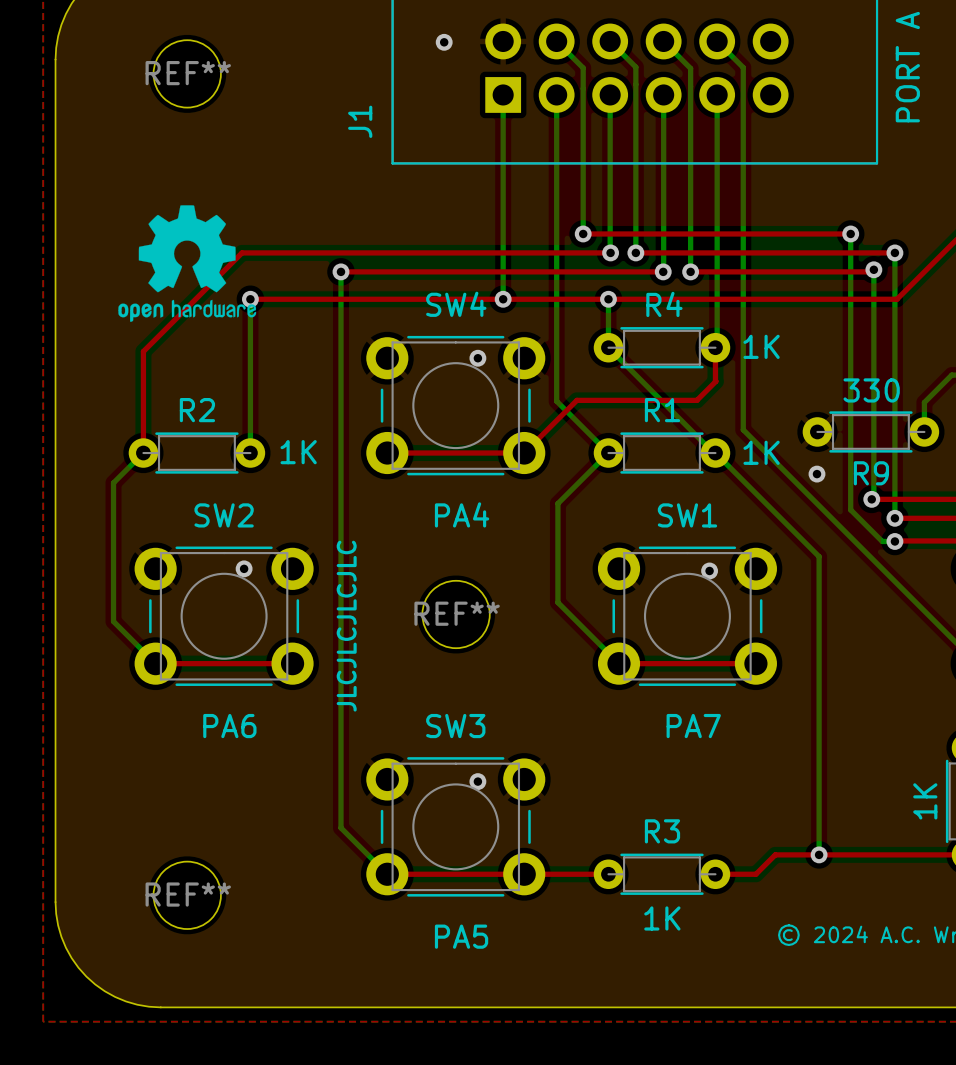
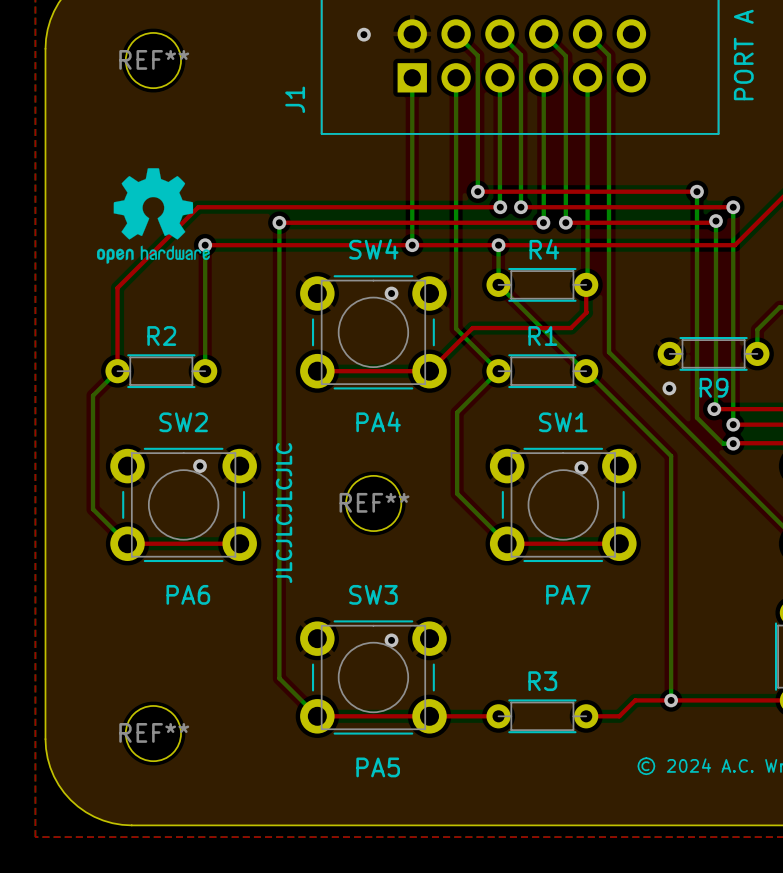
R4 value: 1K (761, 346) -> none
R9 value: 330 (871, 390) -> none
R2 value: 1K (298, 452) -> none
R1 value: 1K (761, 452) -> none
part value: 1K (925, 801) -> none
R3 value: 1K (662, 918) -> none

